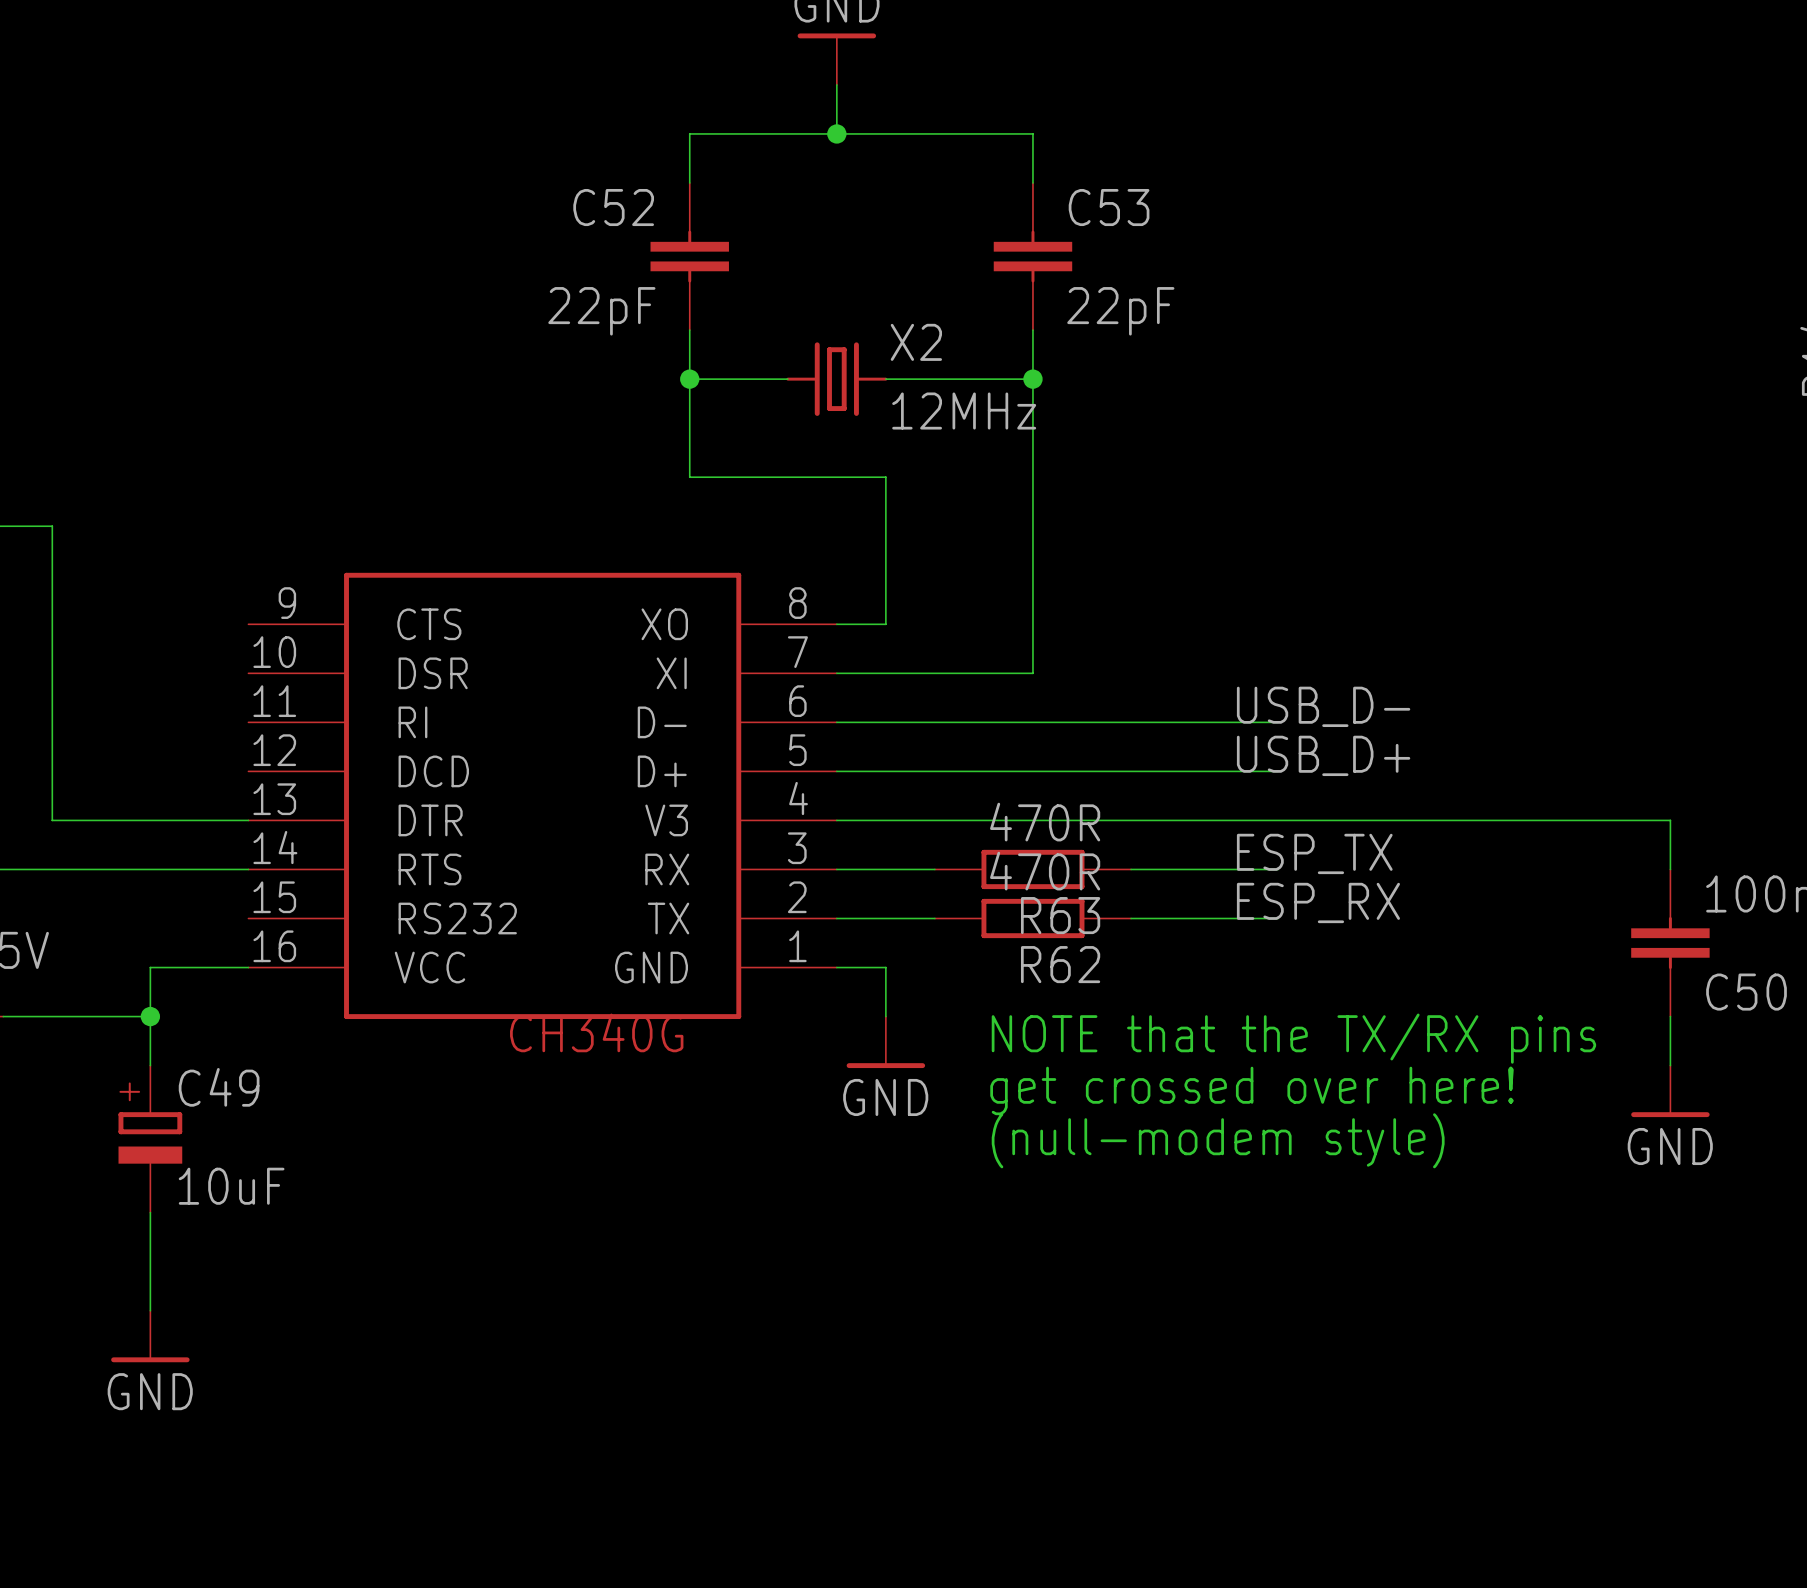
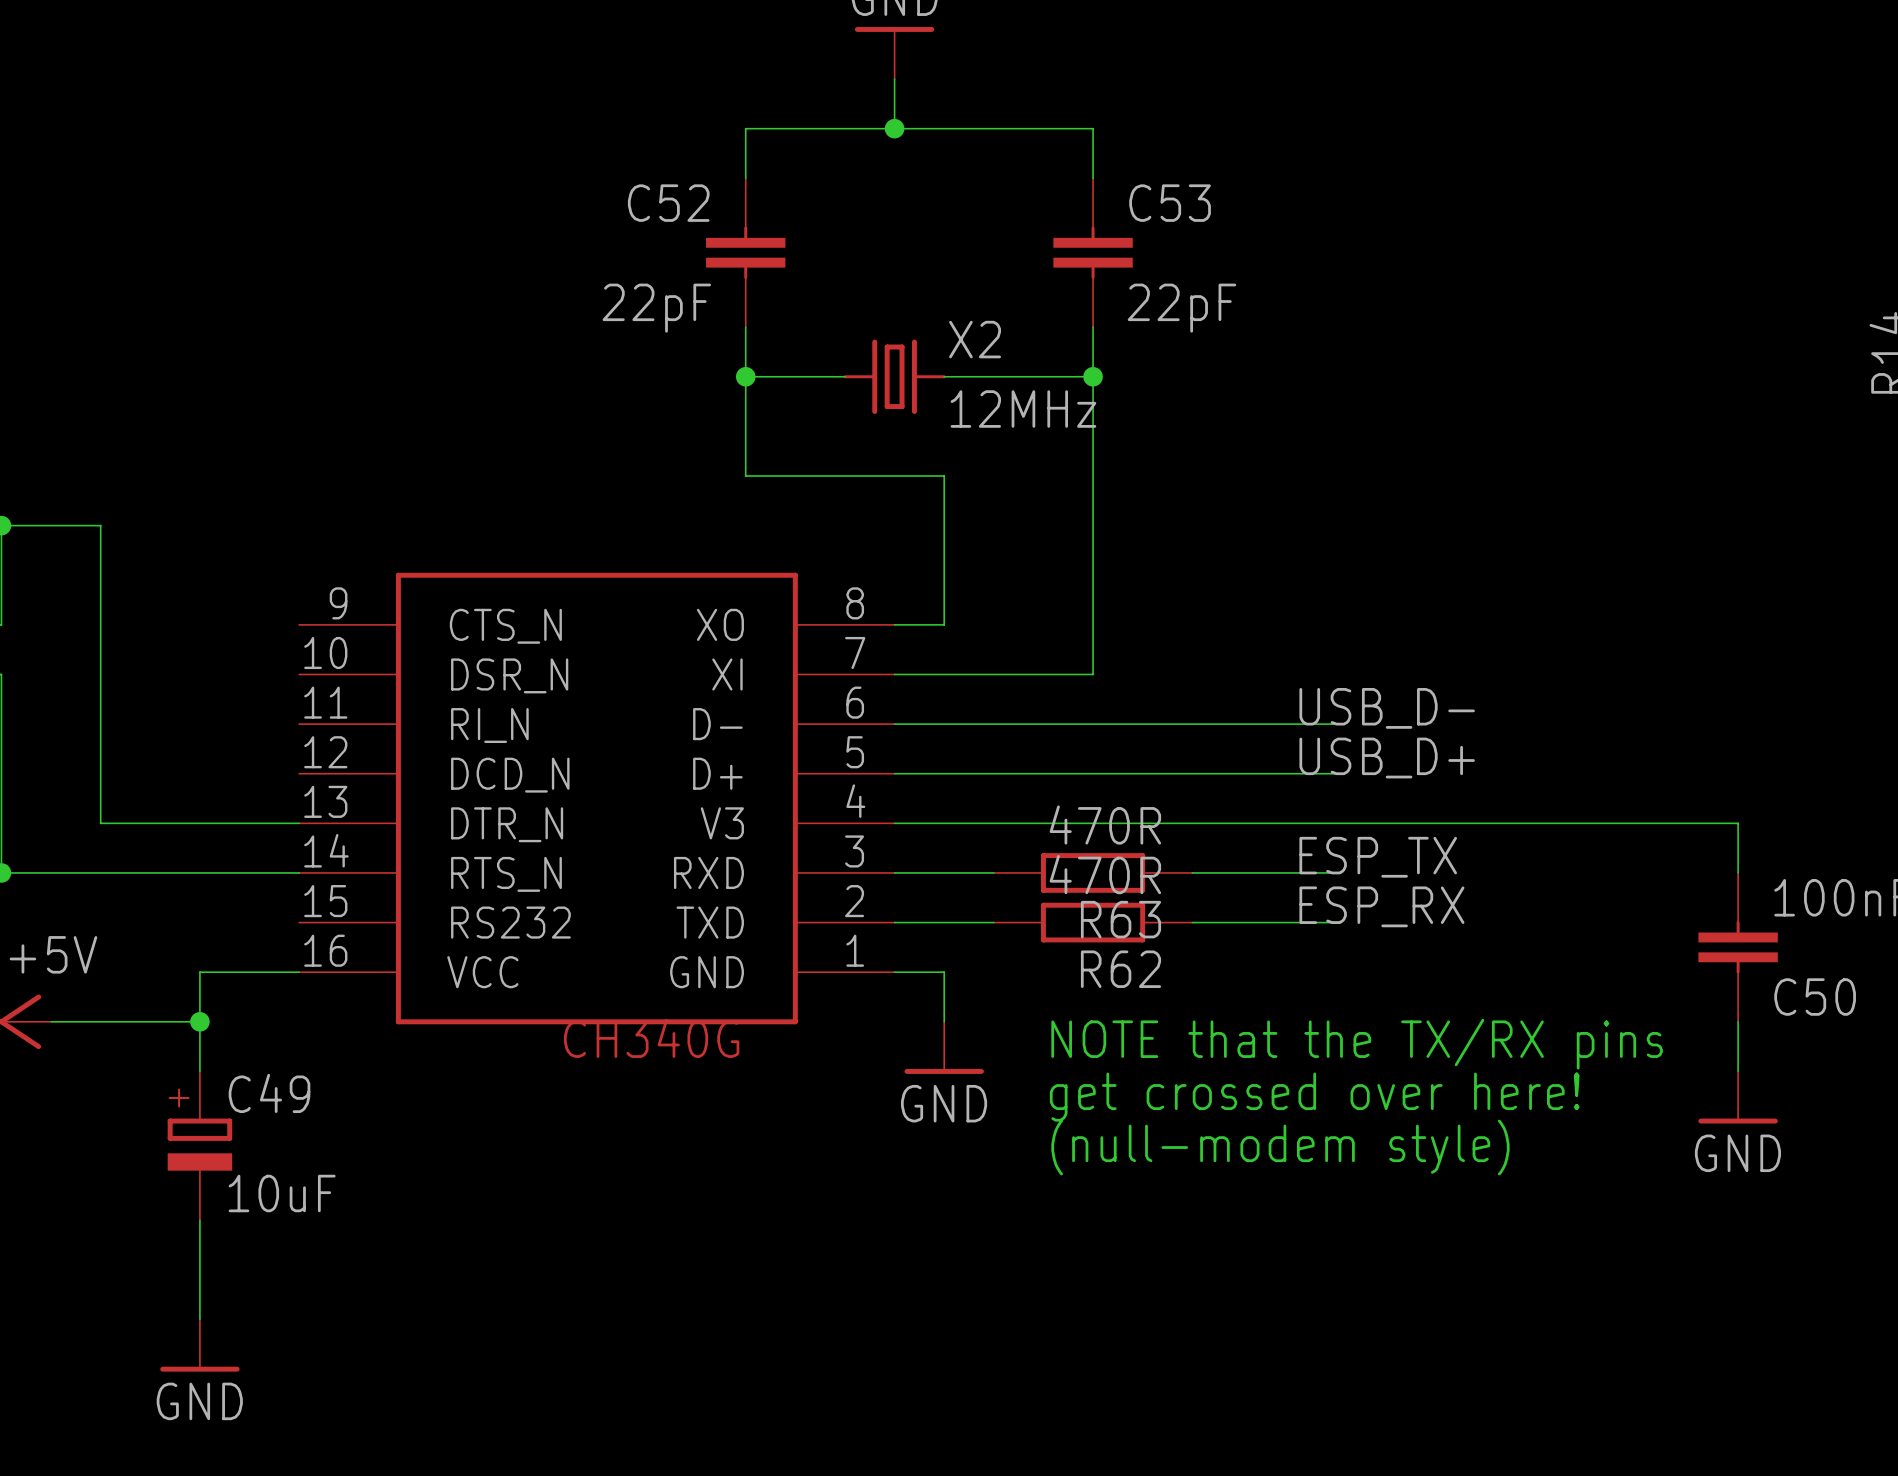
part pin name: CTS (429, 624) -> CTS_N (505, 626)
part pin name: DSR (433, 673) -> DSR_N (509, 675)
part pin name: RI (412, 722) -> RI_N (489, 725)
part pin name: DCD (433, 771) -> DCD_N (510, 775)
part pin name: DTR (430, 820) -> DTR_N (507, 824)
part pin name: RTS (429, 869) -> RTS_N (506, 874)
part pin name: RX (667, 869) -> RXD (708, 872)
part pin name: TX (668, 918) -> TXD (710, 922)

